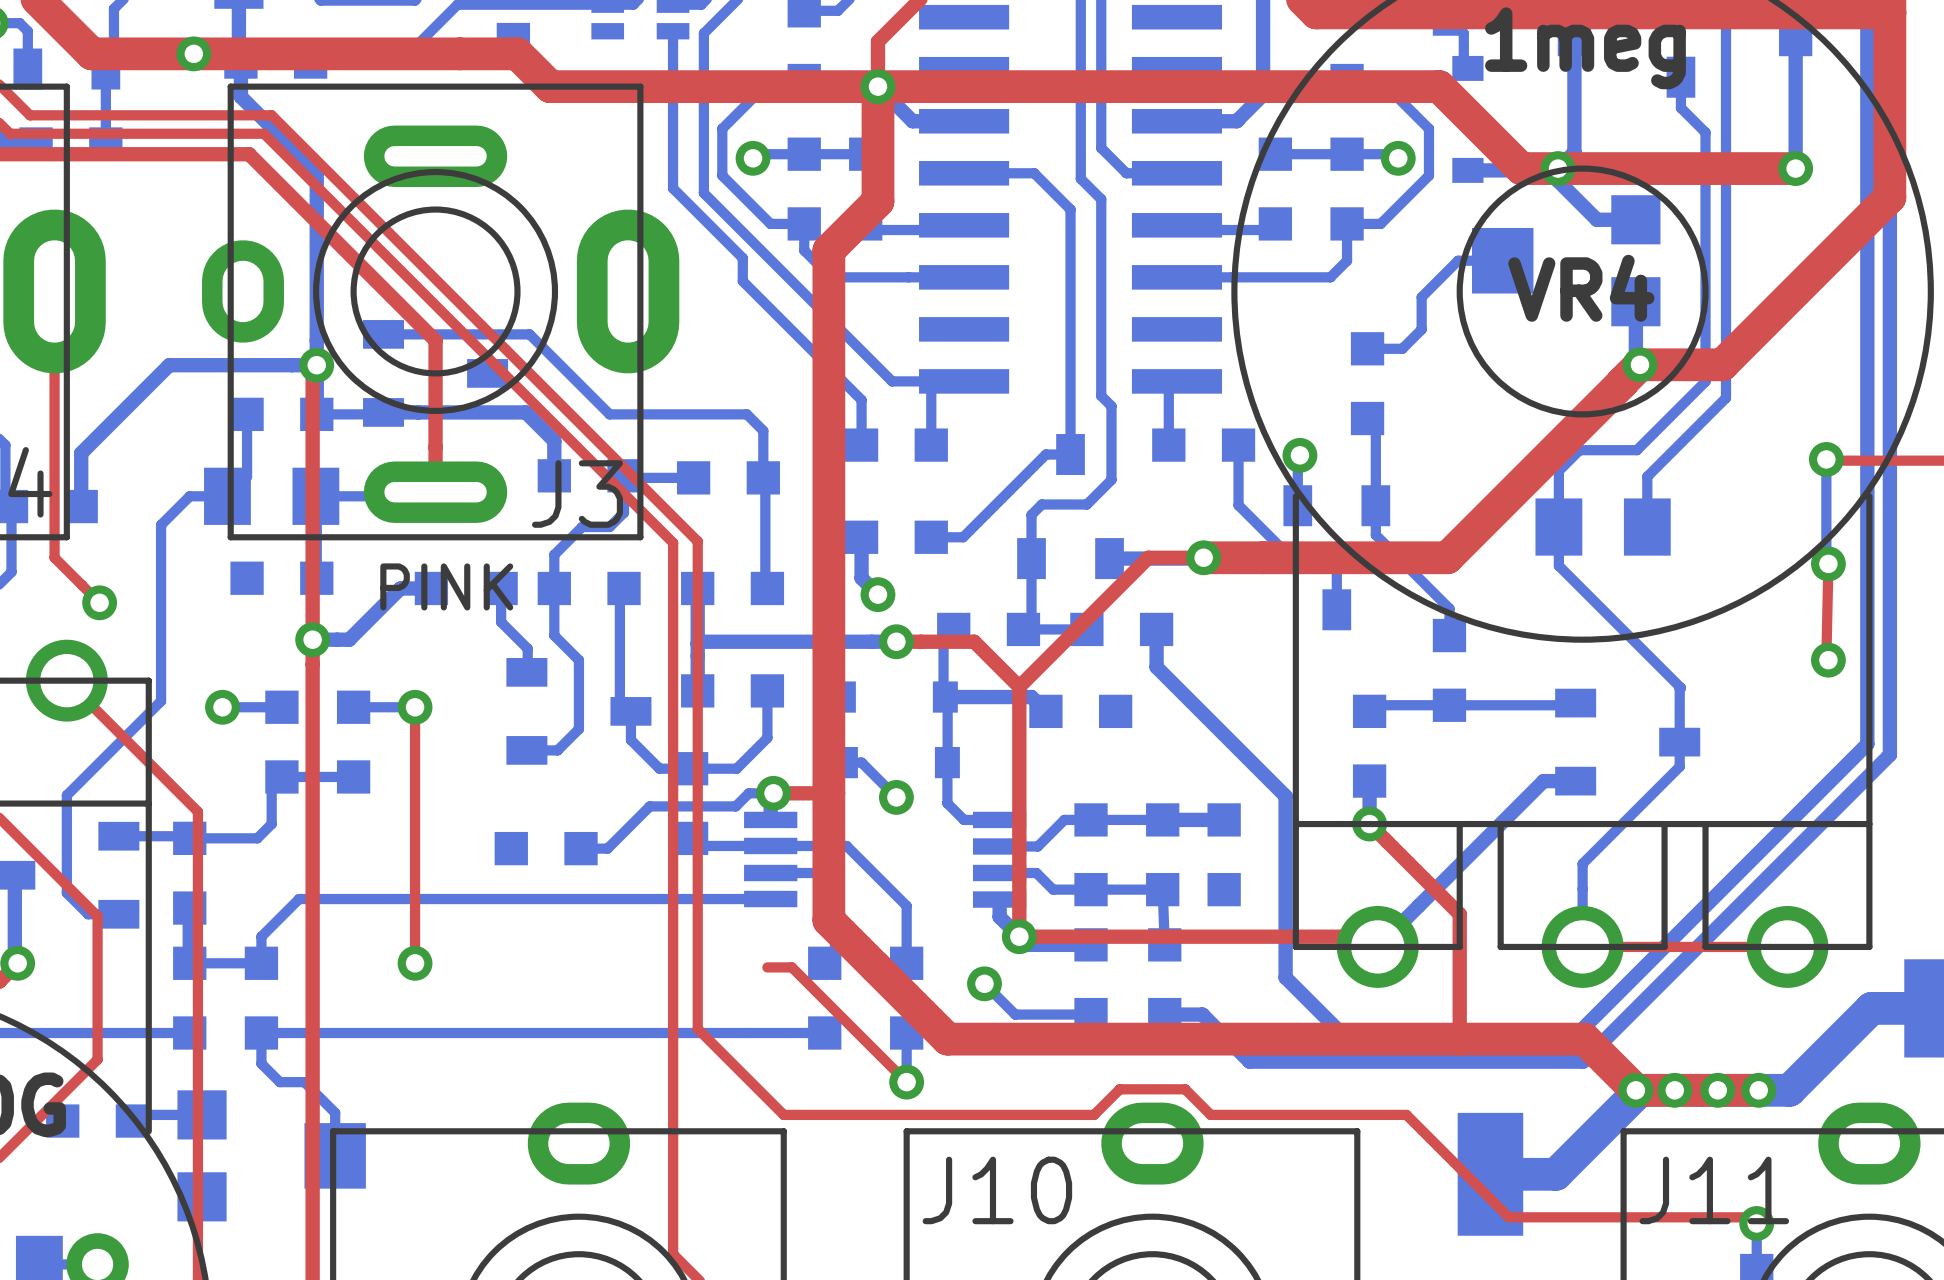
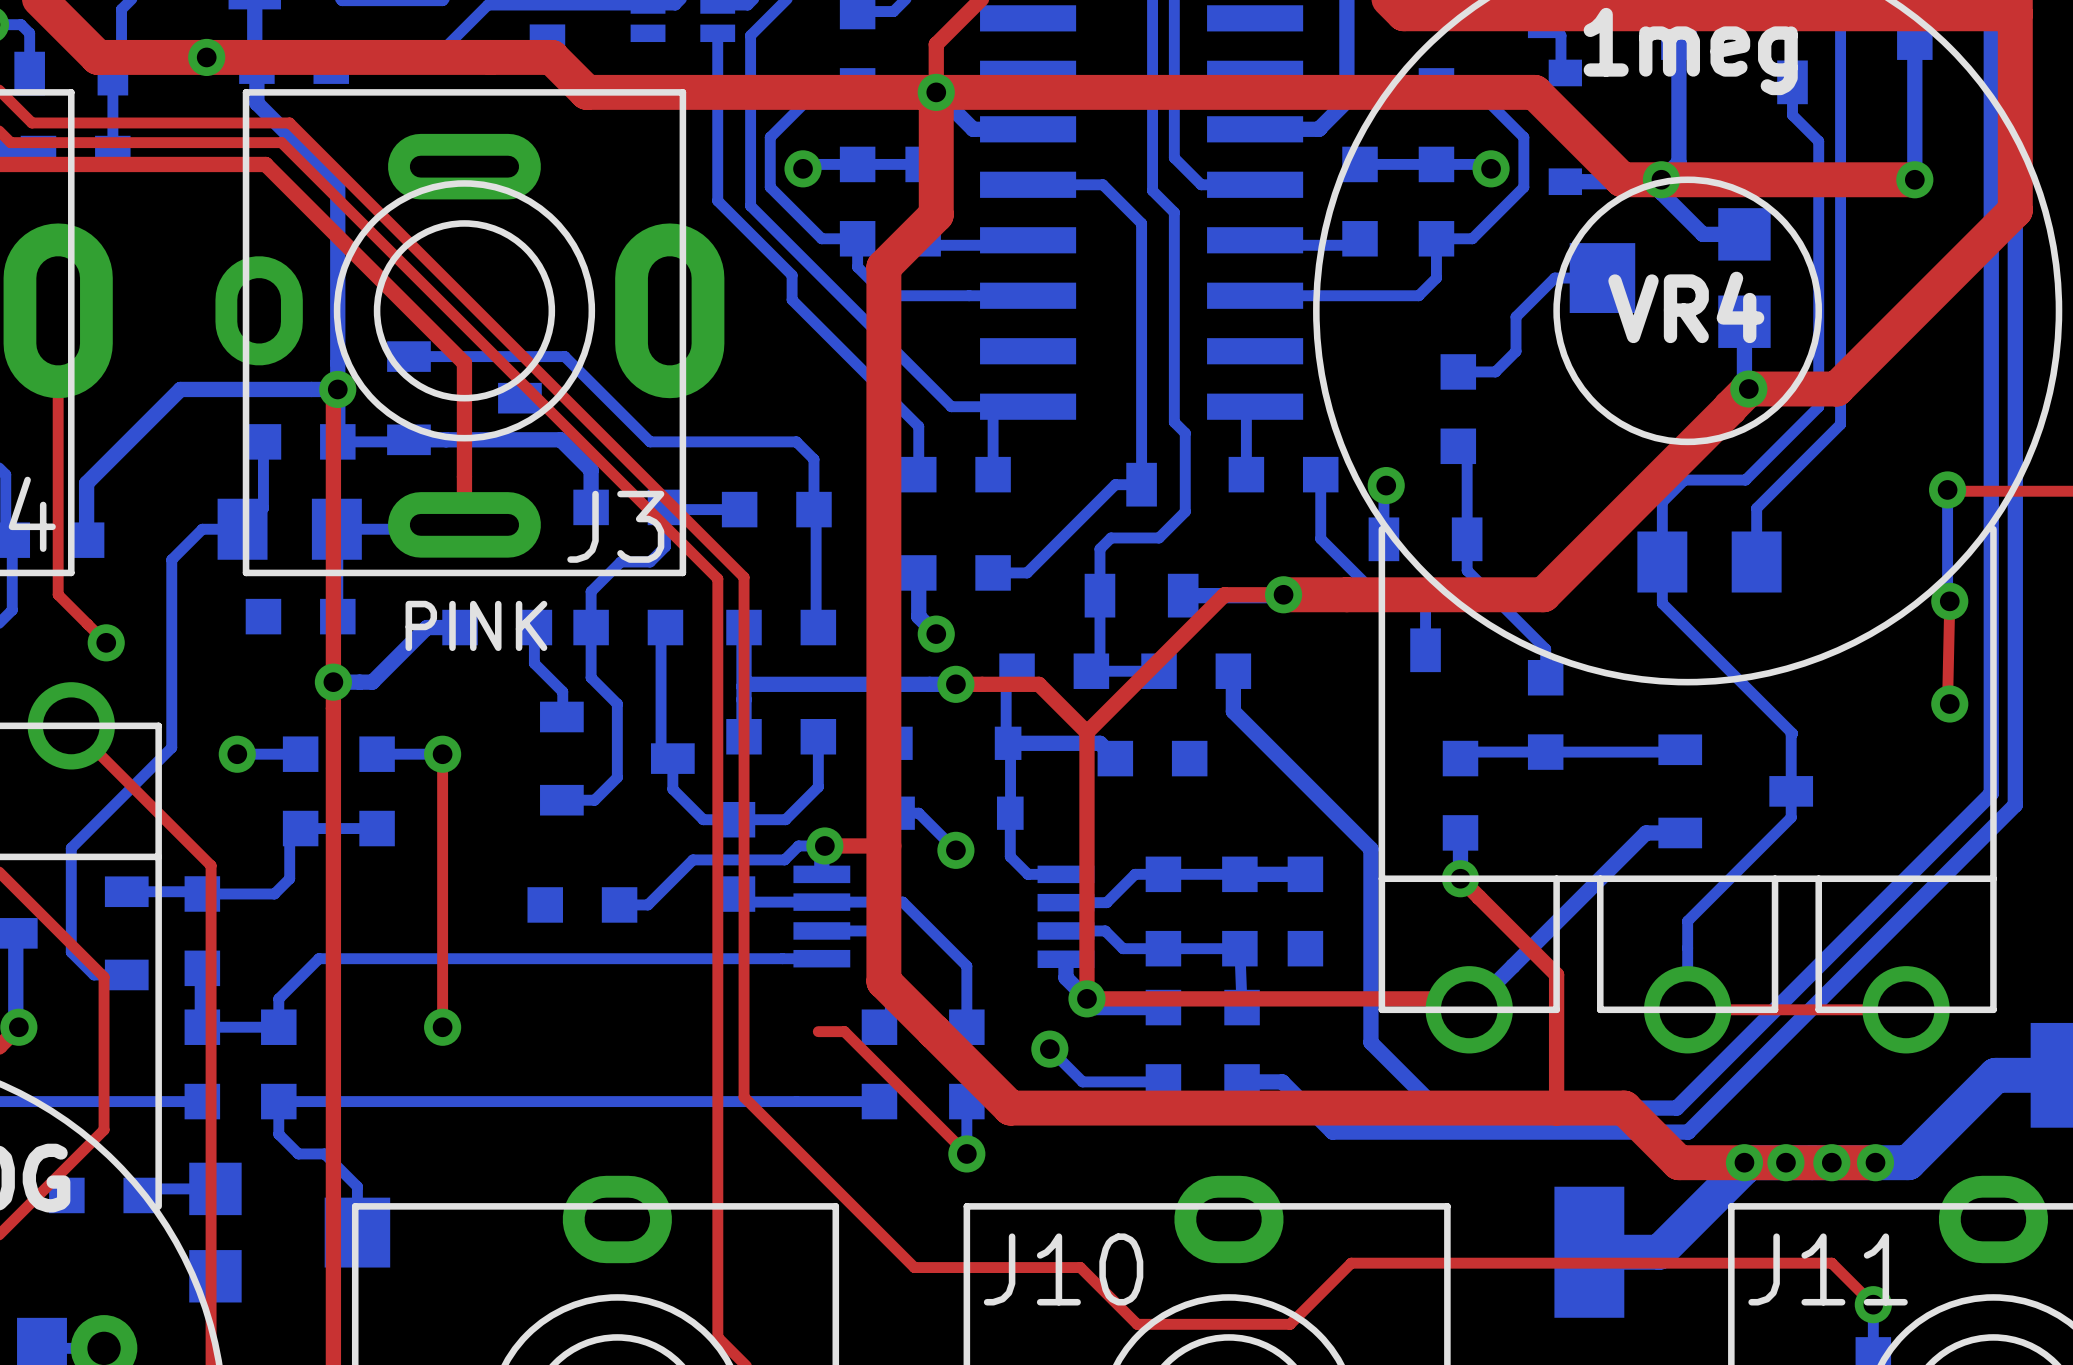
top track: (1523, 1039) (1584, 1039) (1635, 1090) -> (1624, 1108) (1678, 1162) (1744, 1162)
top track: (783, 1114) (1094, 1114) (1119, 1089) (1185, 1089) (1210, 1114) (1406, 1114) (1508, 1217) (1750, 1217) -> (835, 1188) (914, 1267) (1080, 1267) (1137, 1324) (1290, 1324) (1351, 1263) (1831, 1263) (1866, 1298)

